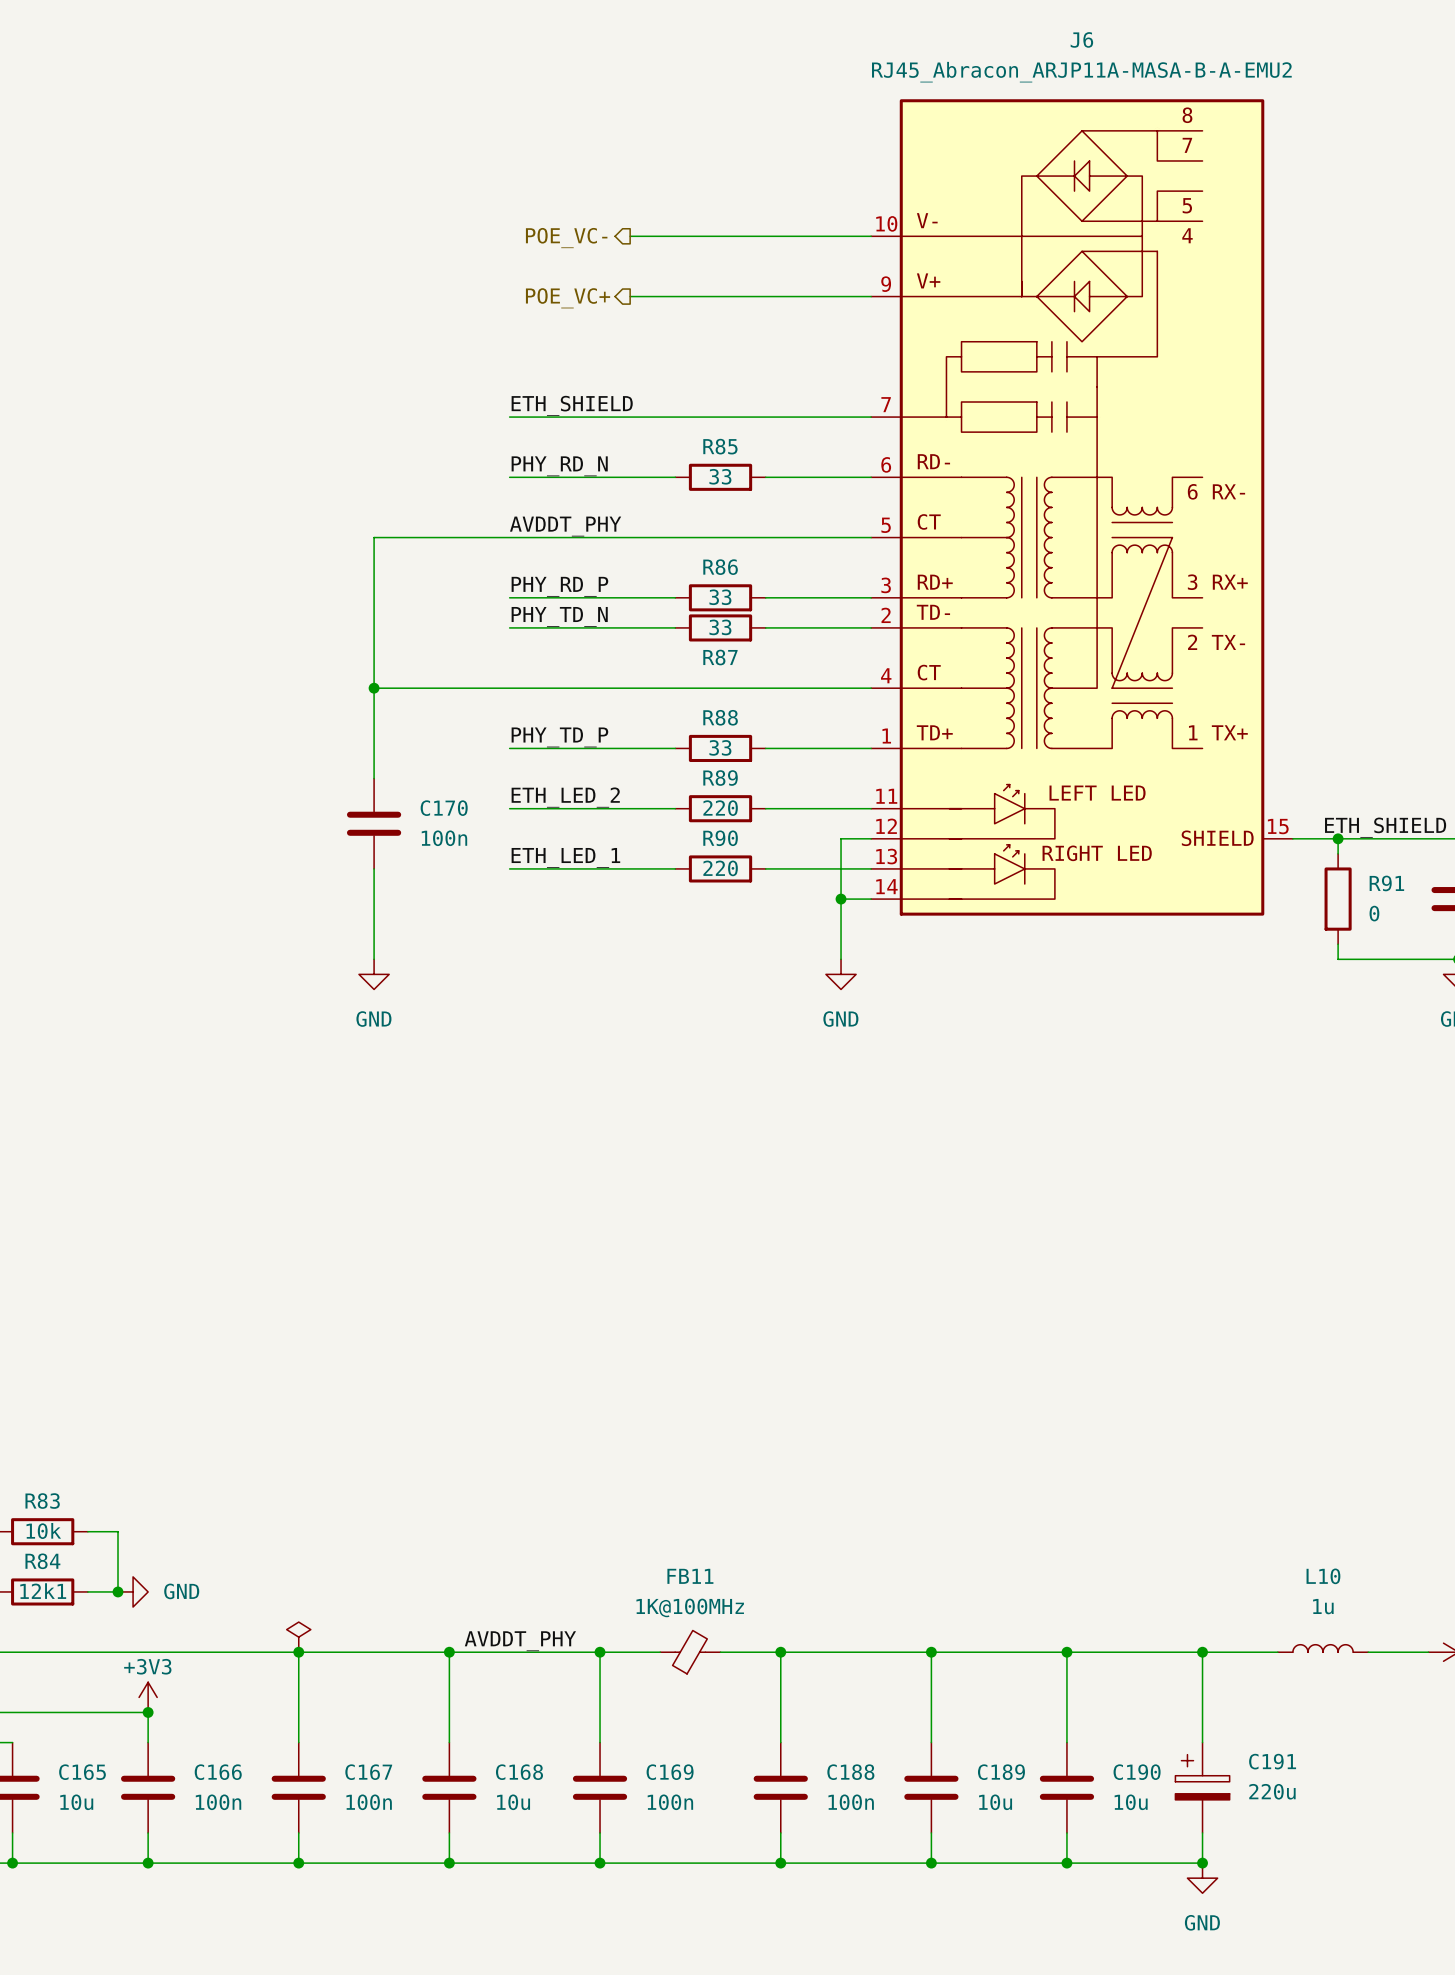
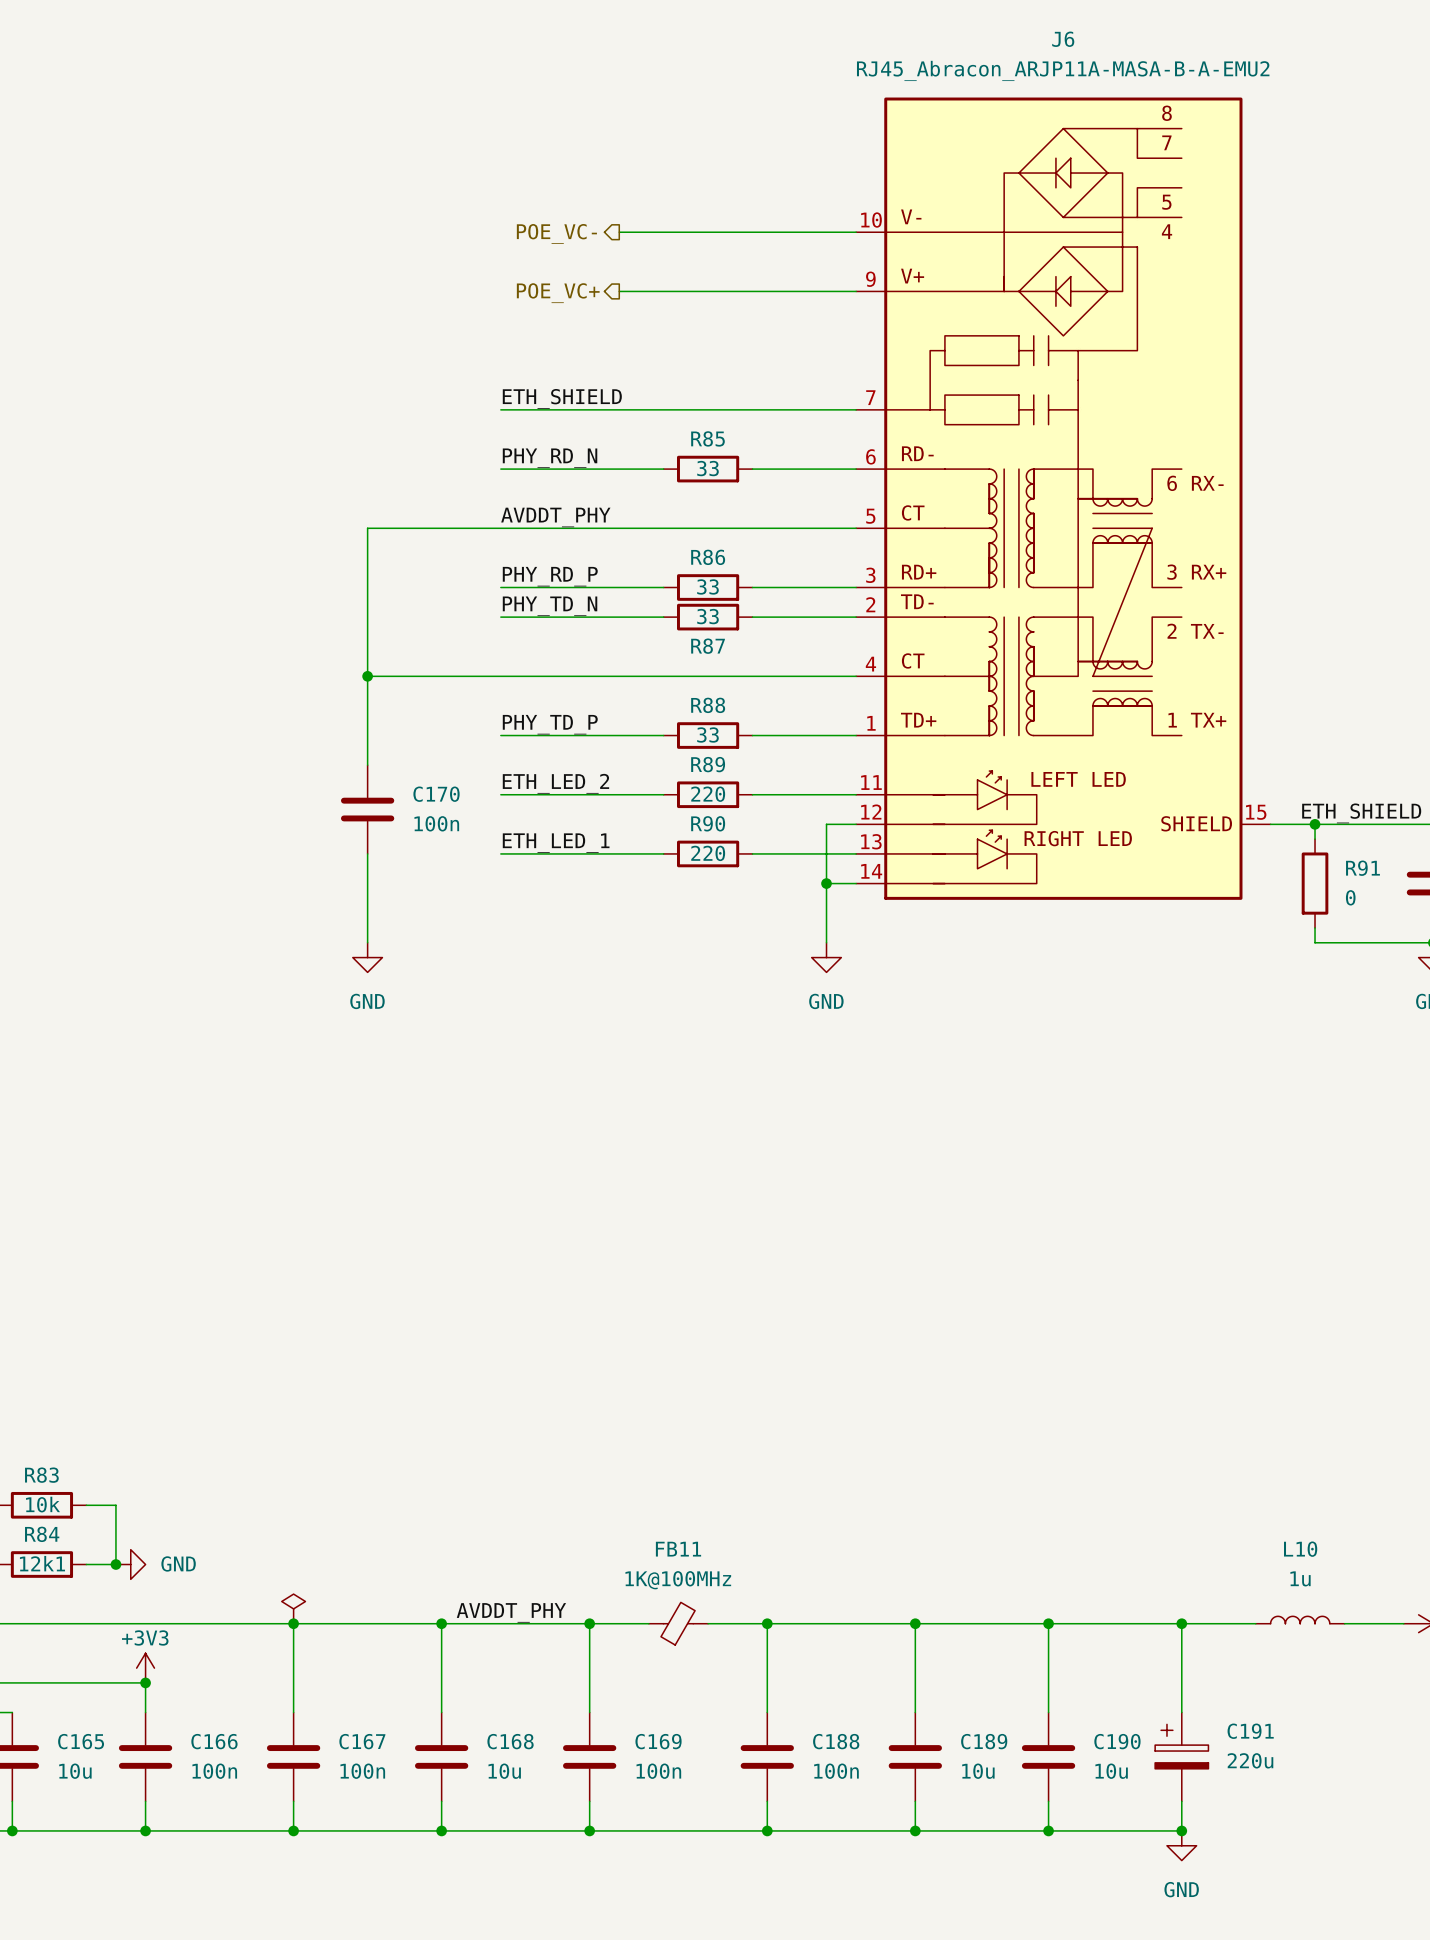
J6 symbol: [871, 99, 1293, 916] -> [856, 97, 1271, 900]

